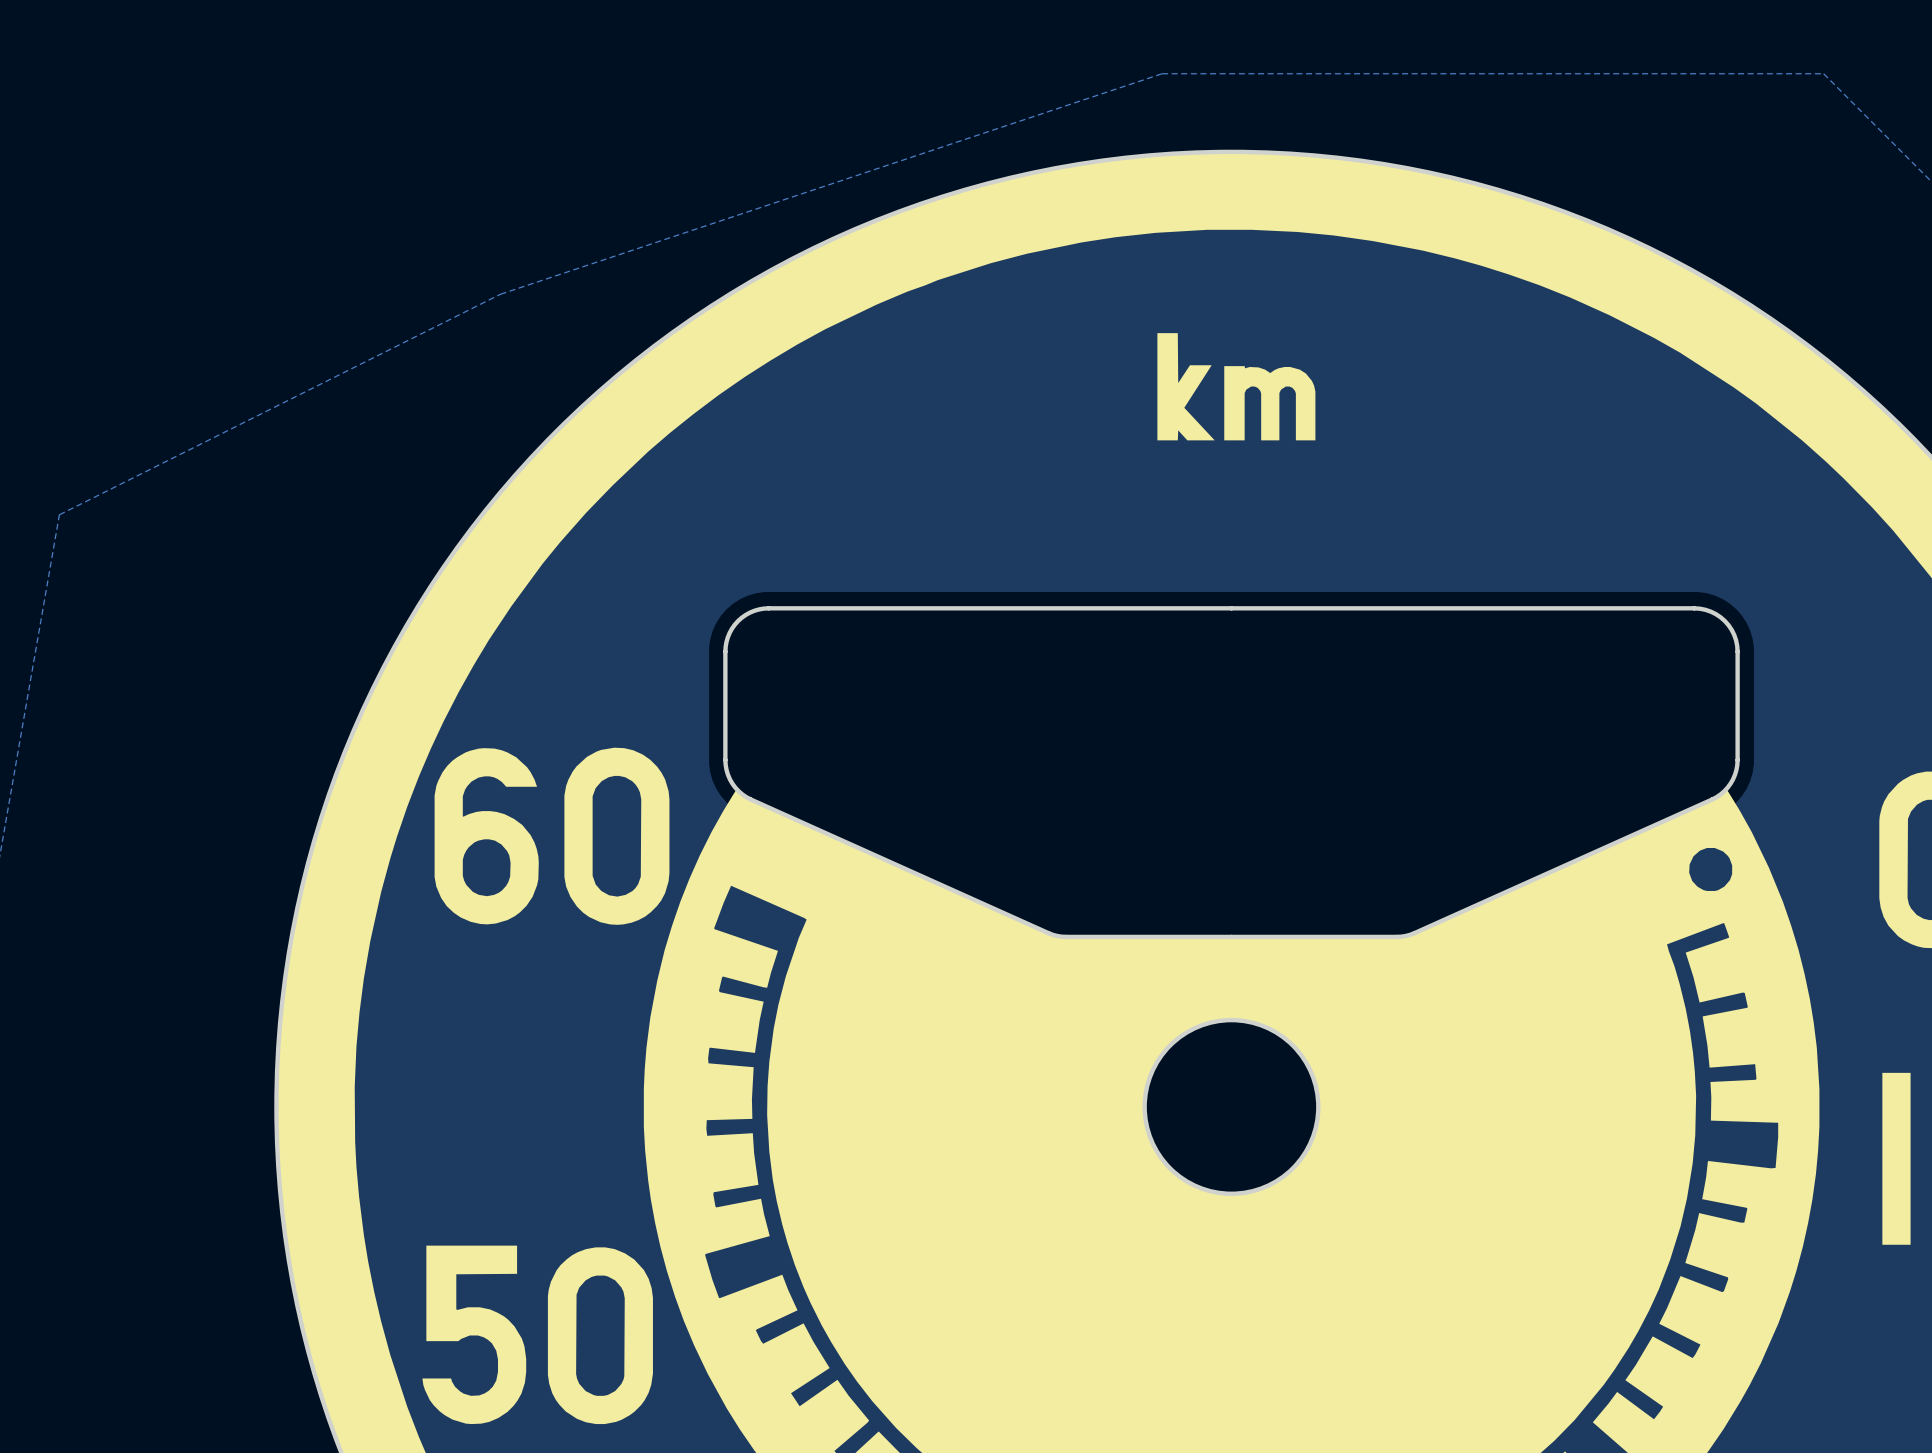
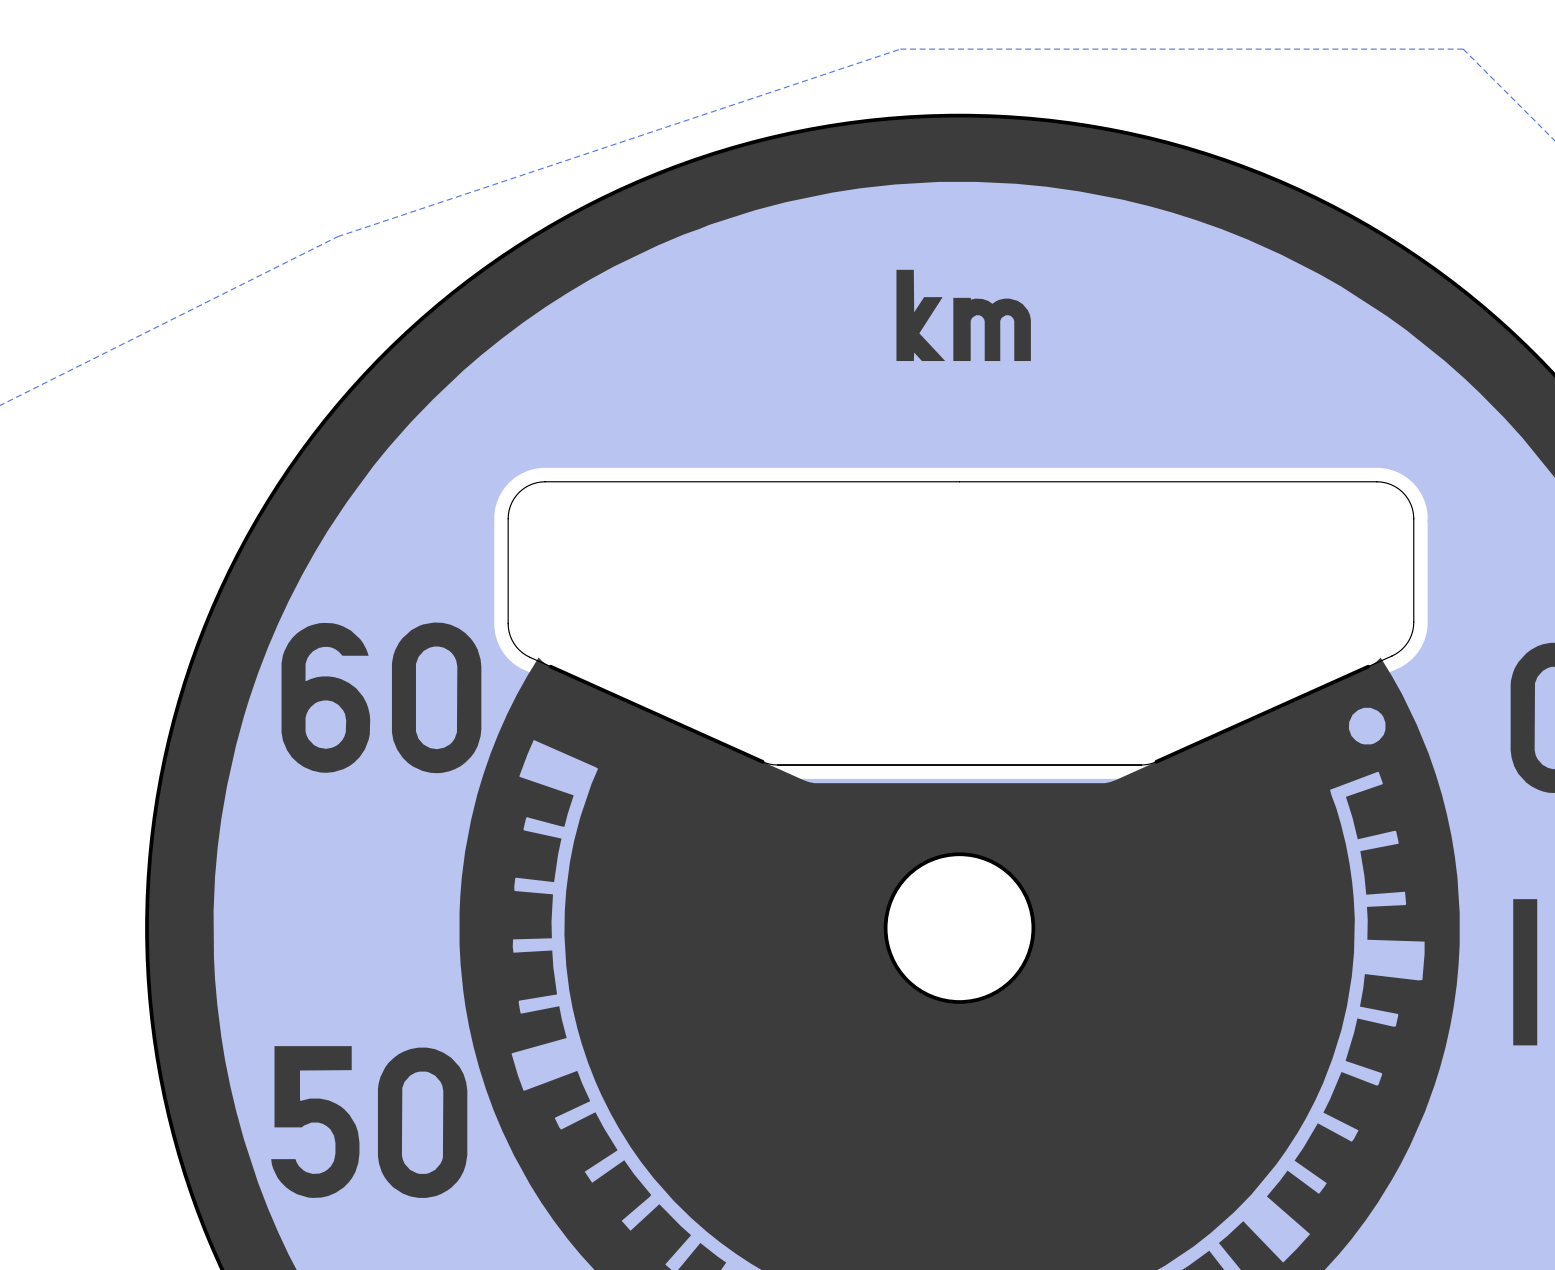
board edge: (1711, 799) (1727, 787) (1733, 779) (1737, 764) (1737, 646) (1731, 630) (1720, 617) (1705, 609) (1694, 608) (759, 609) (745, 614) (734, 624) (727, 637) (725, 651) (725, 764) (732, 783) (738, 791) (751, 799) -> (1368, 666) (1402, 648) (1411, 634) (1413, 622) (1412, 509) (1406, 496) (1399, 489) (1390, 484) (1376, 481) (536, 482) (518, 492) (509, 510) (508, 627) (512, 640) (519, 650) (550, 666)
board edge: (1462, 911) (1410, 934) (1396, 936) (1061, 936) (1048, 933) (1000, 911) -> (1156, 761) (1141, 765) (777, 765) (762, 761)

